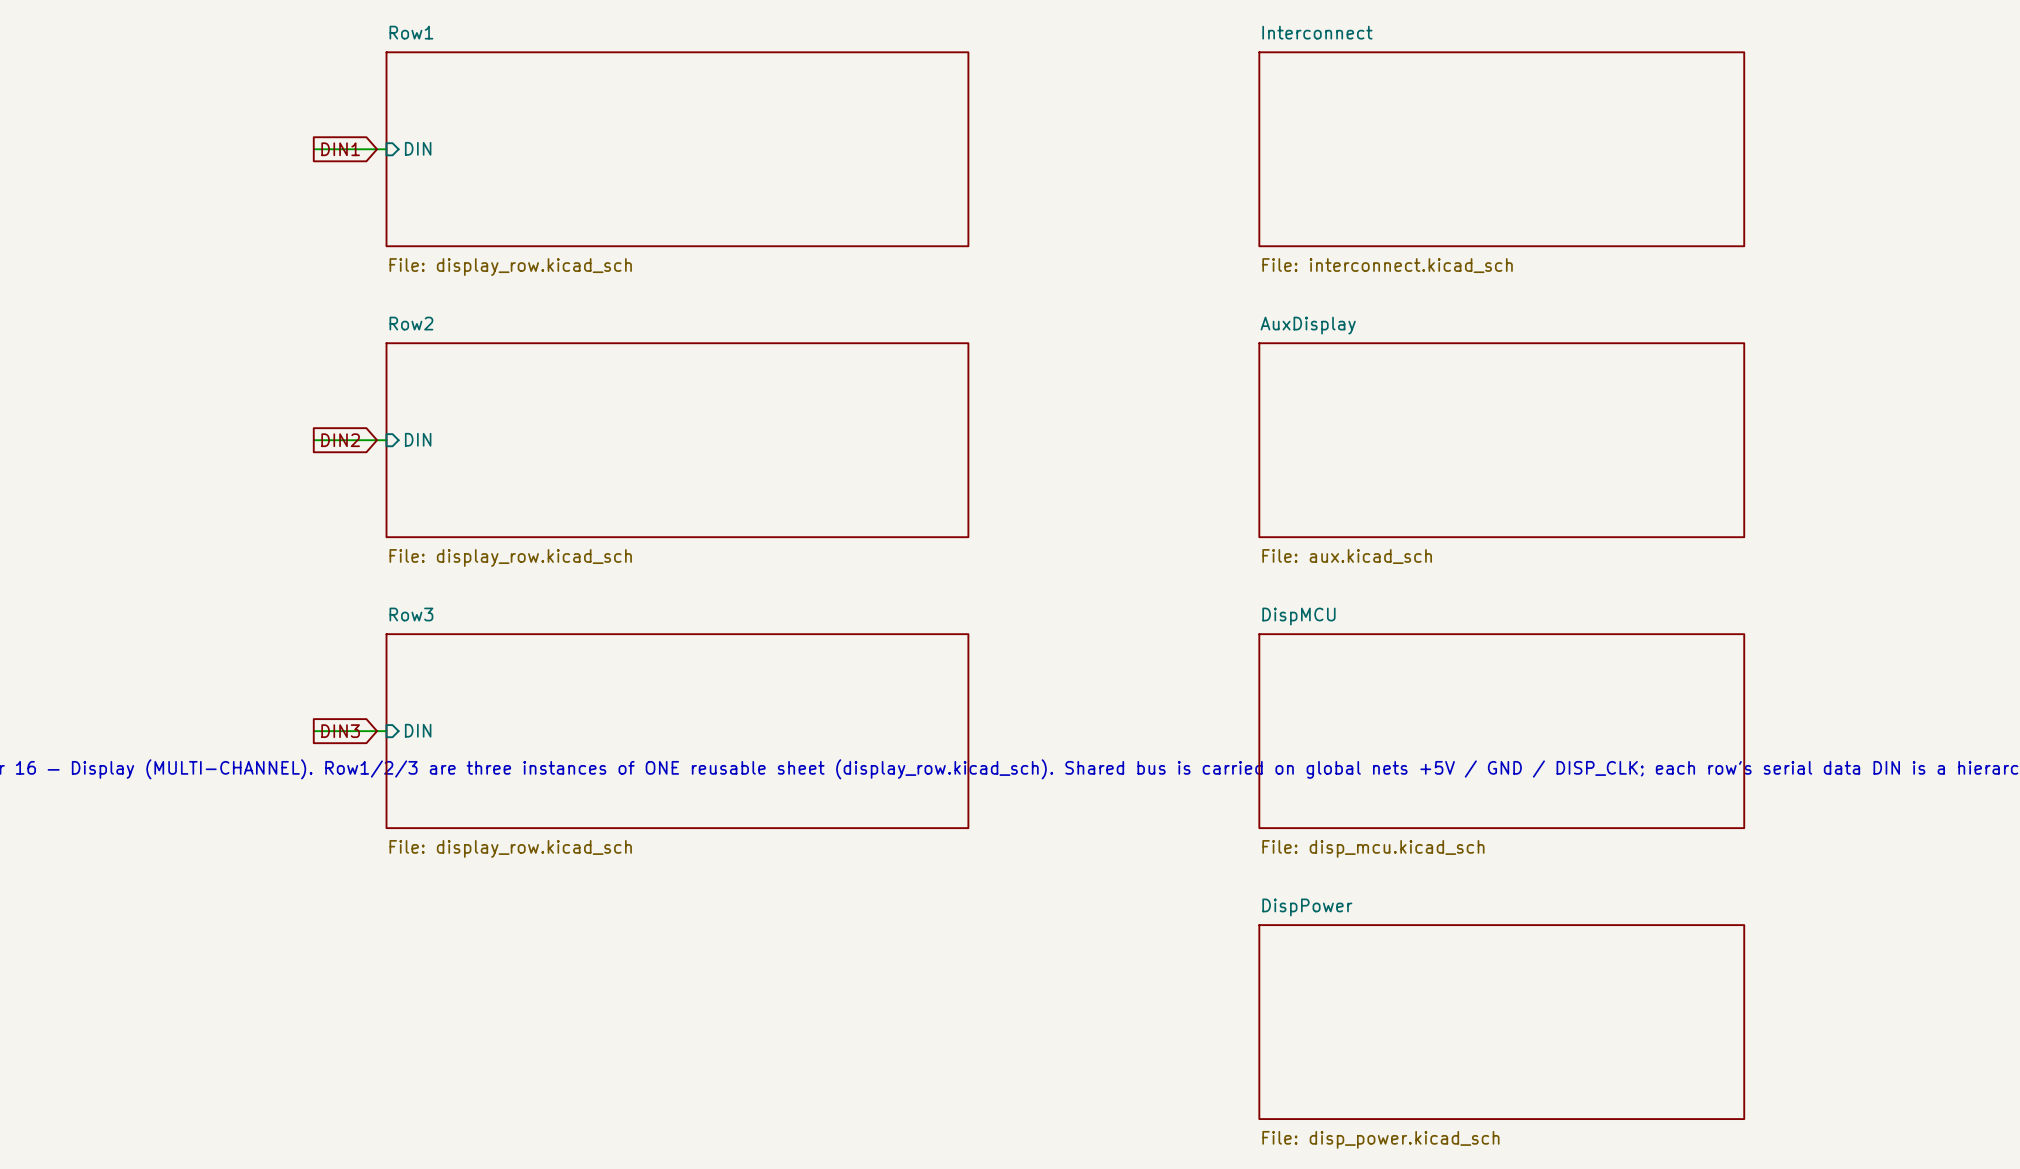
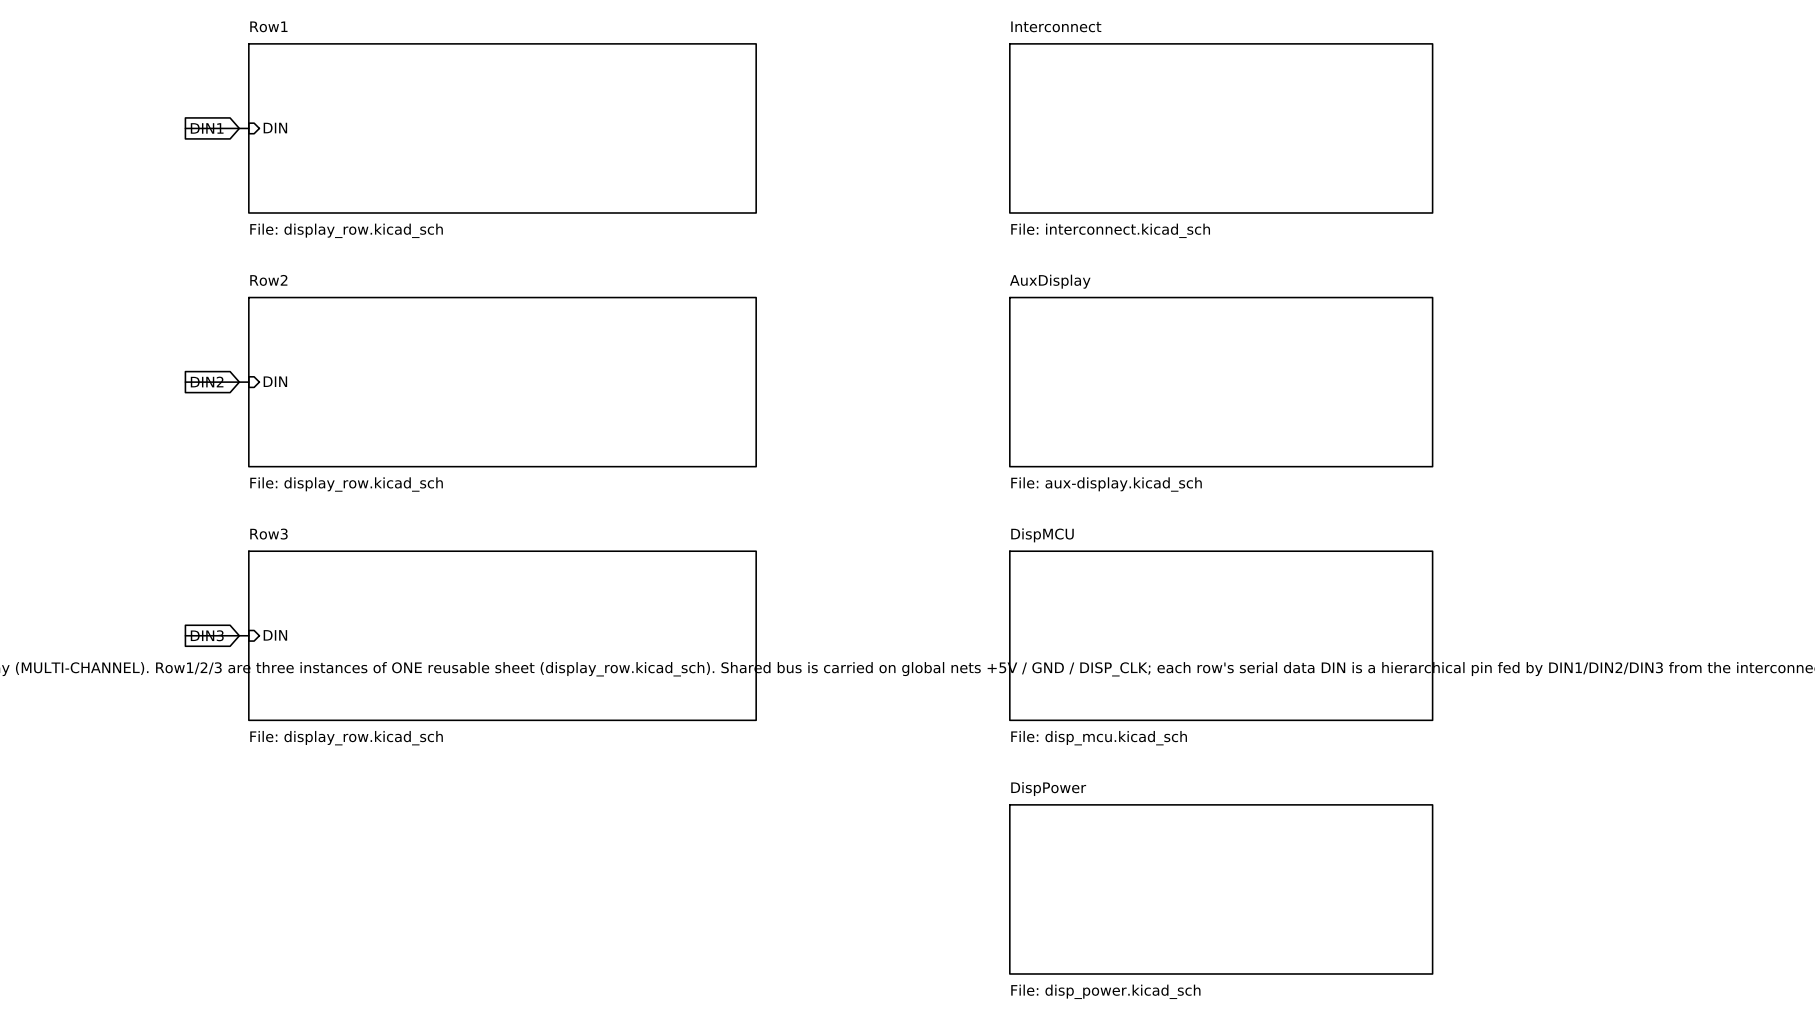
sheet AuxDisplay value: File: aux.kicad_sch (1347, 556) -> File: aux-display.kicad_sch (1106, 484)

